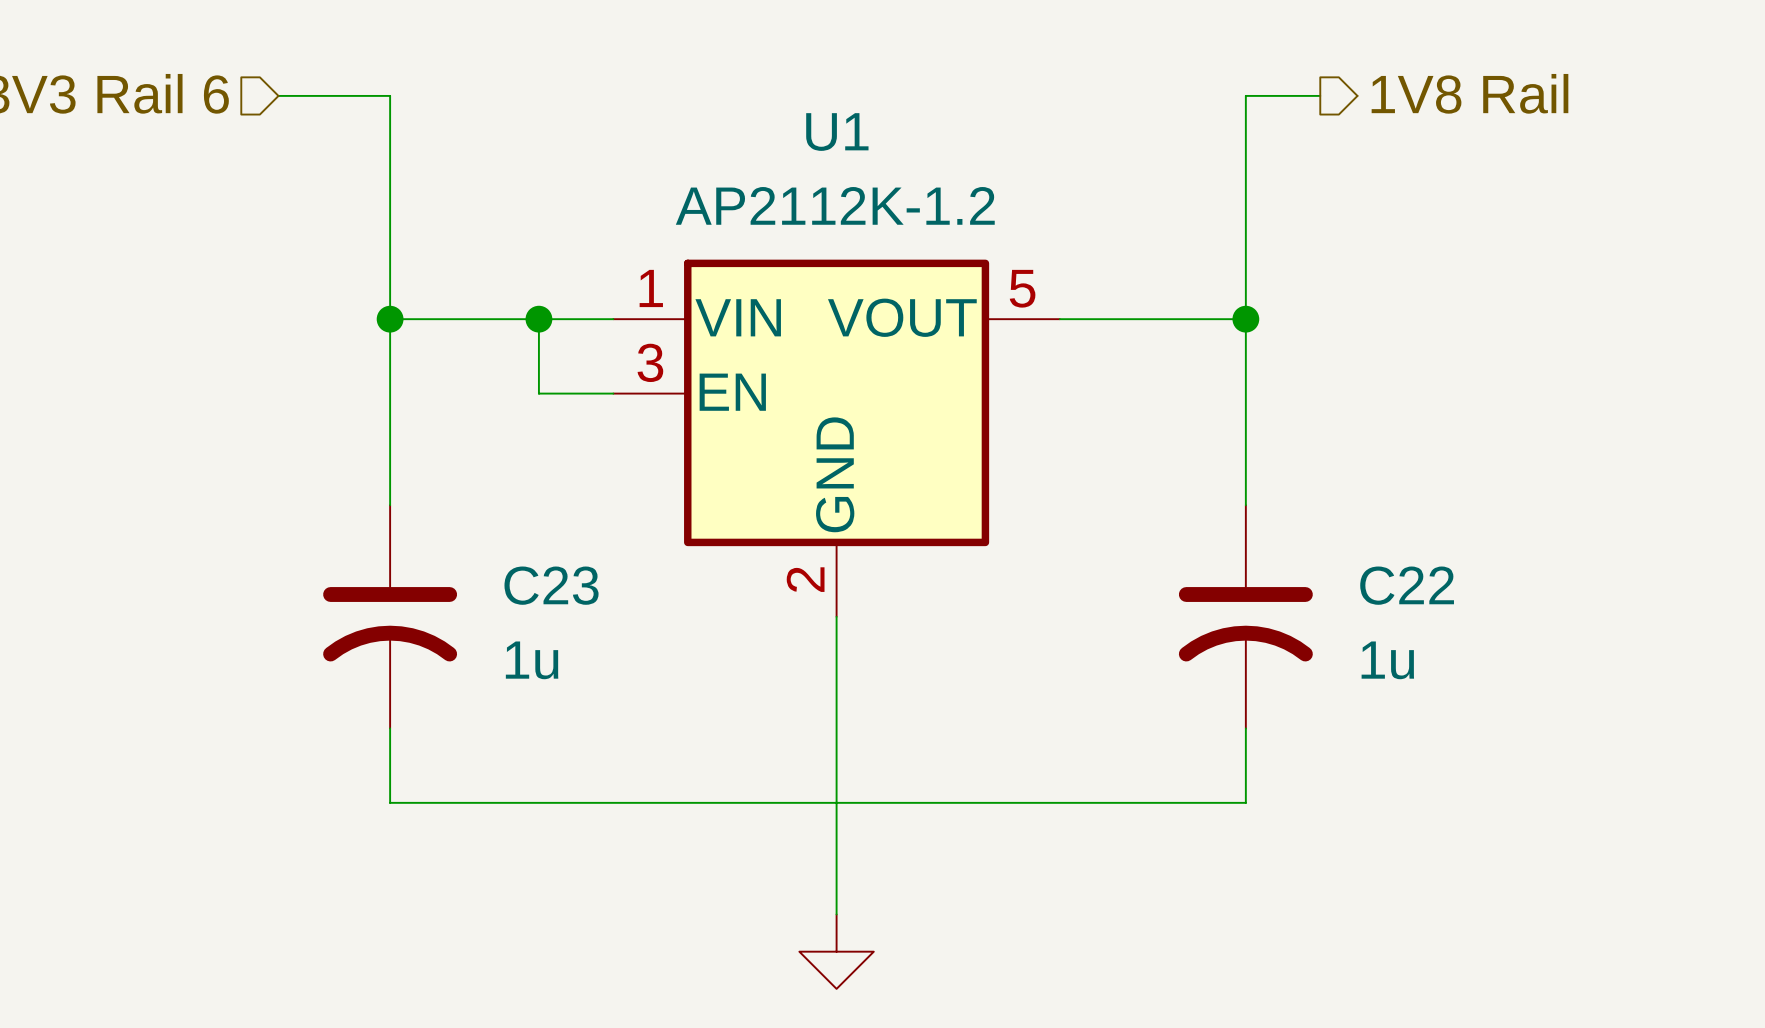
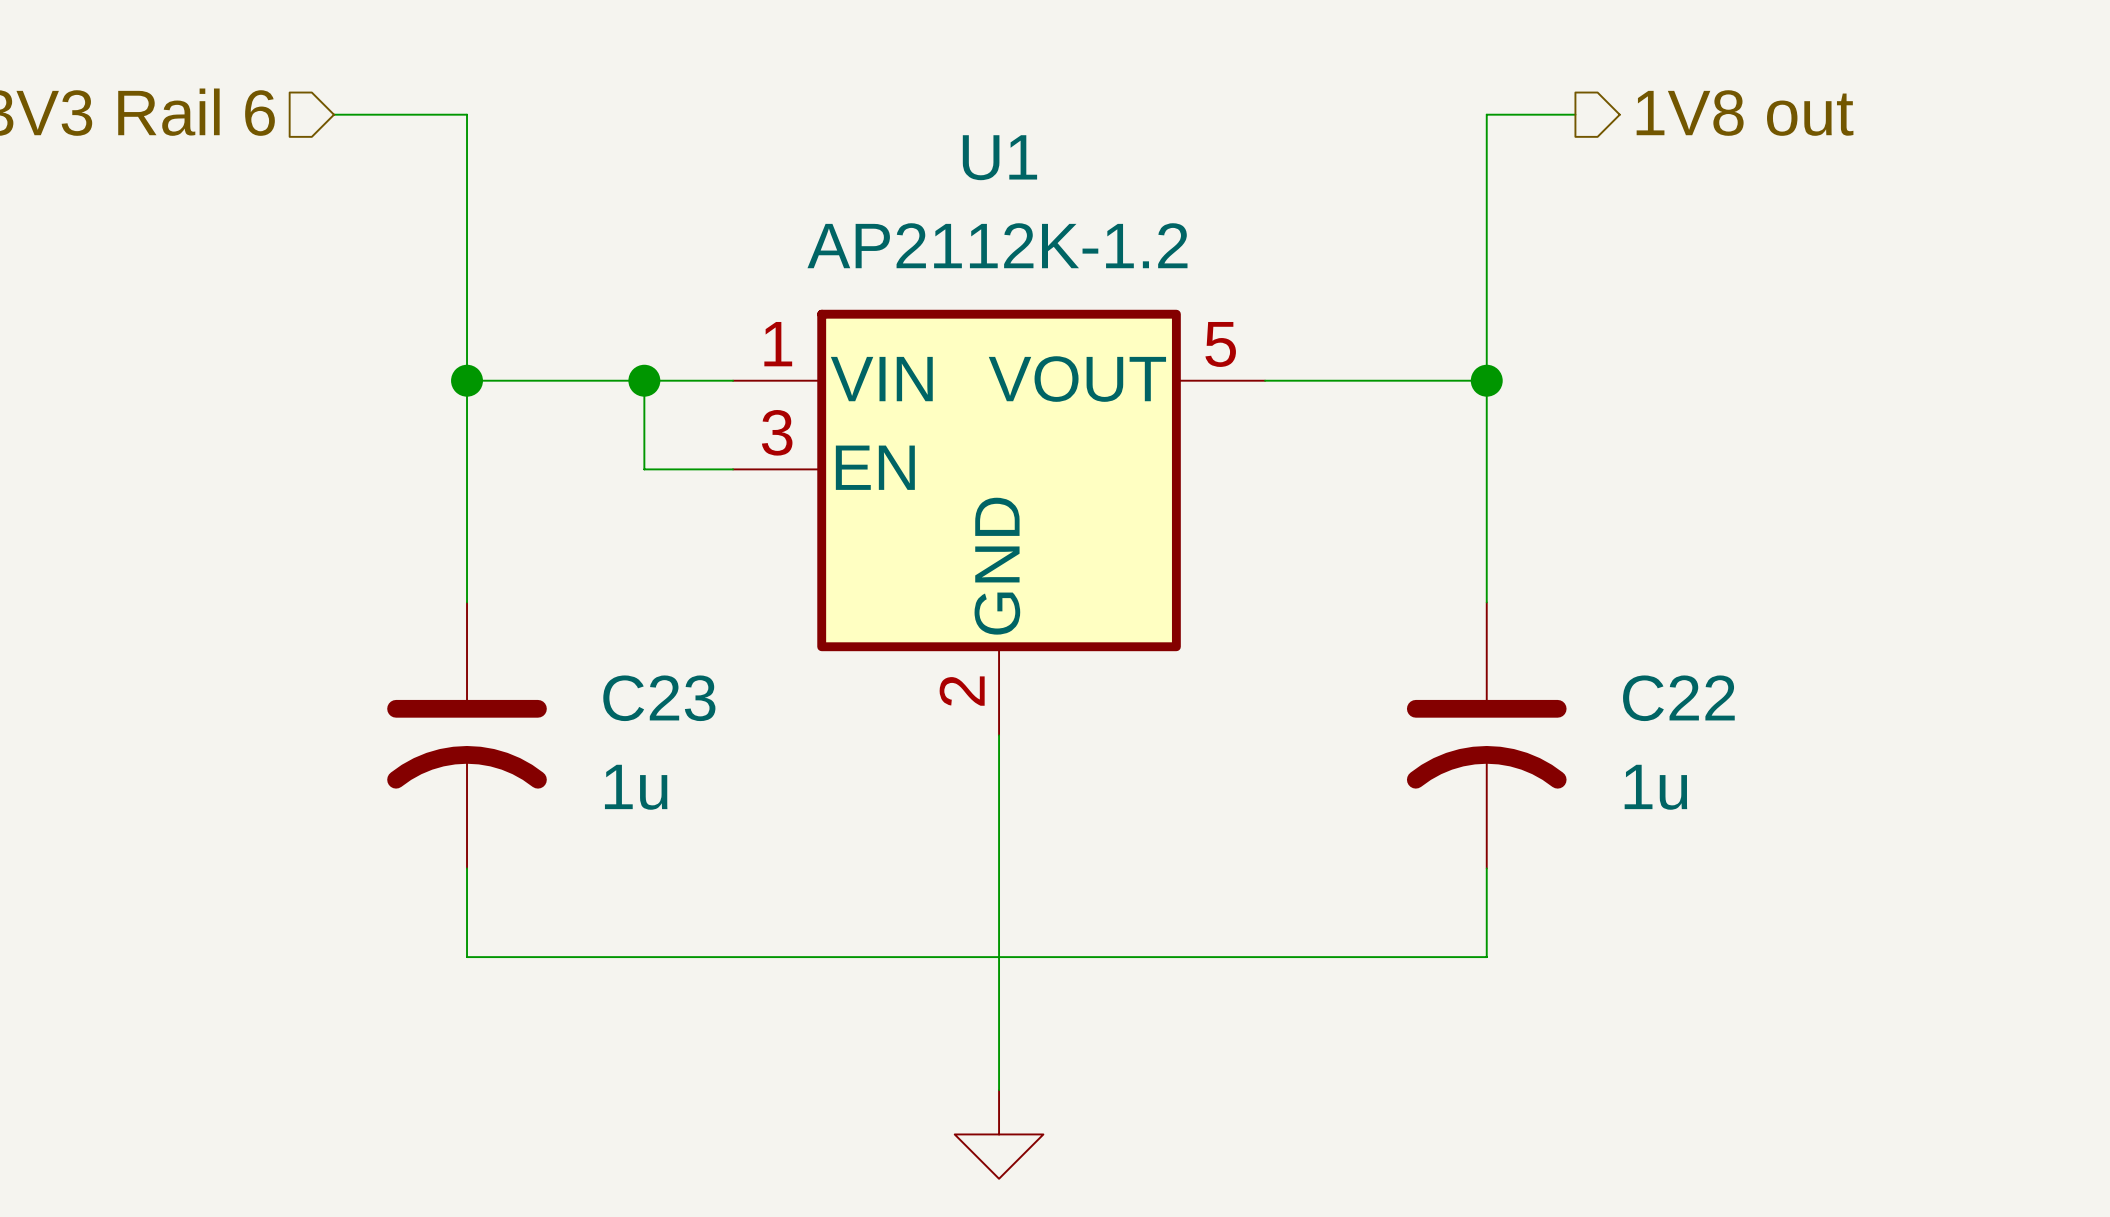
hierarchical label: 1V8 Rail (1469, 93) -> 1V8 out (1745, 113)

